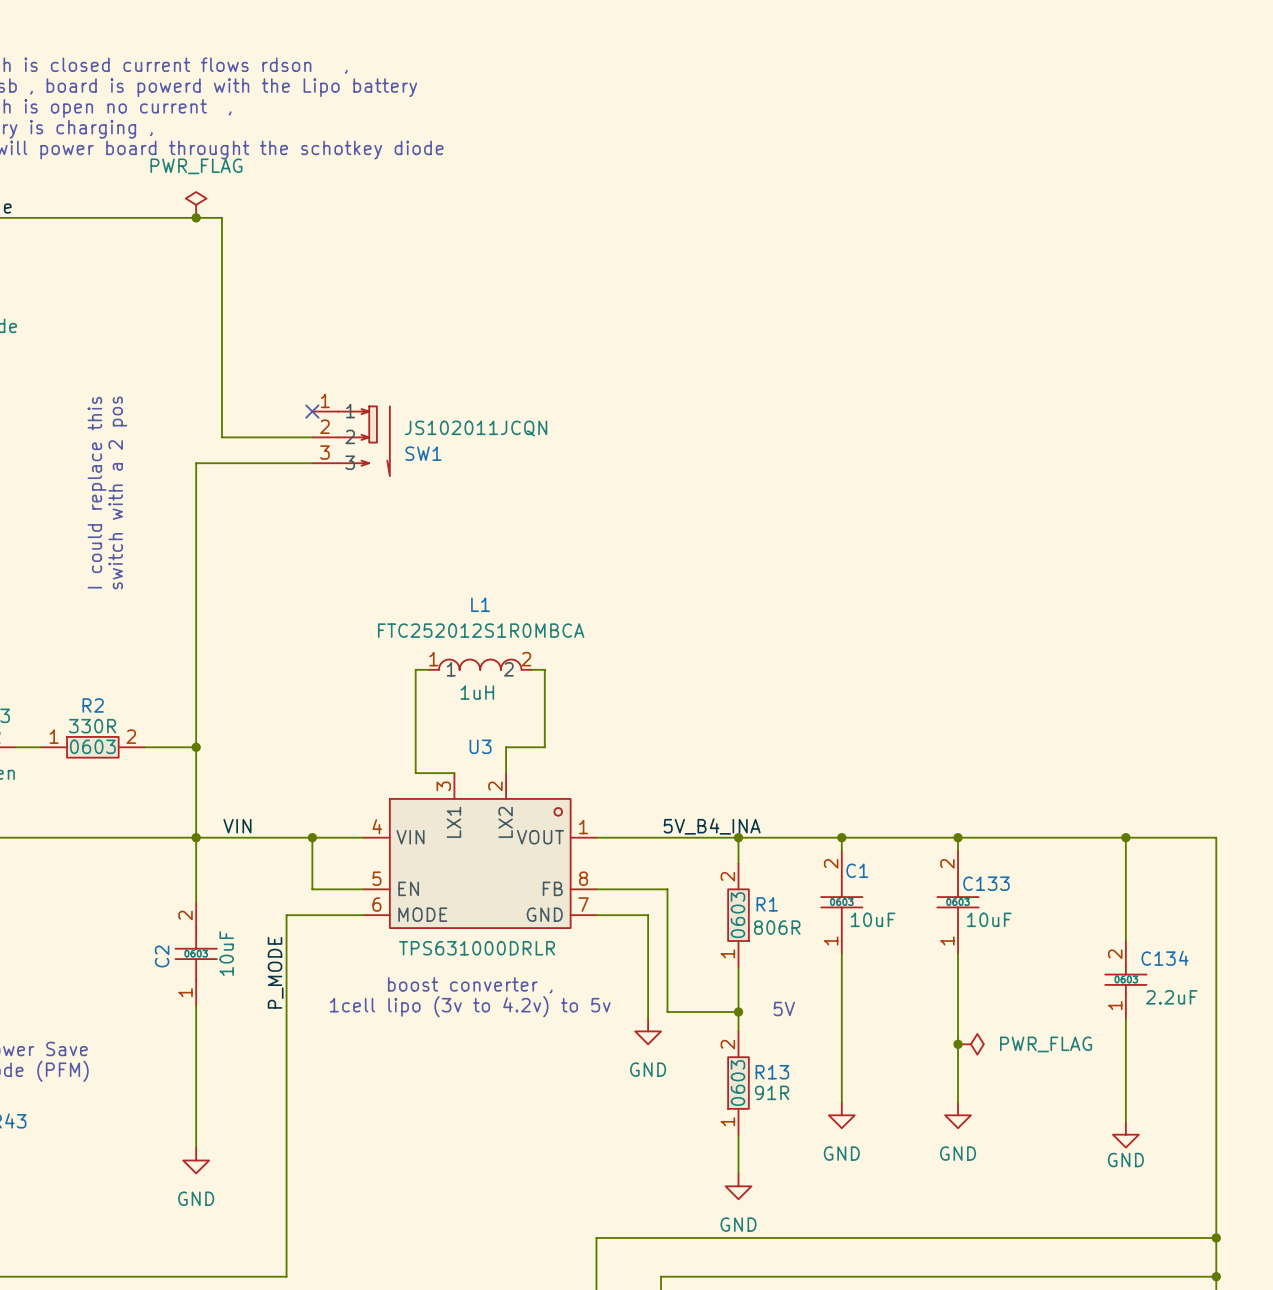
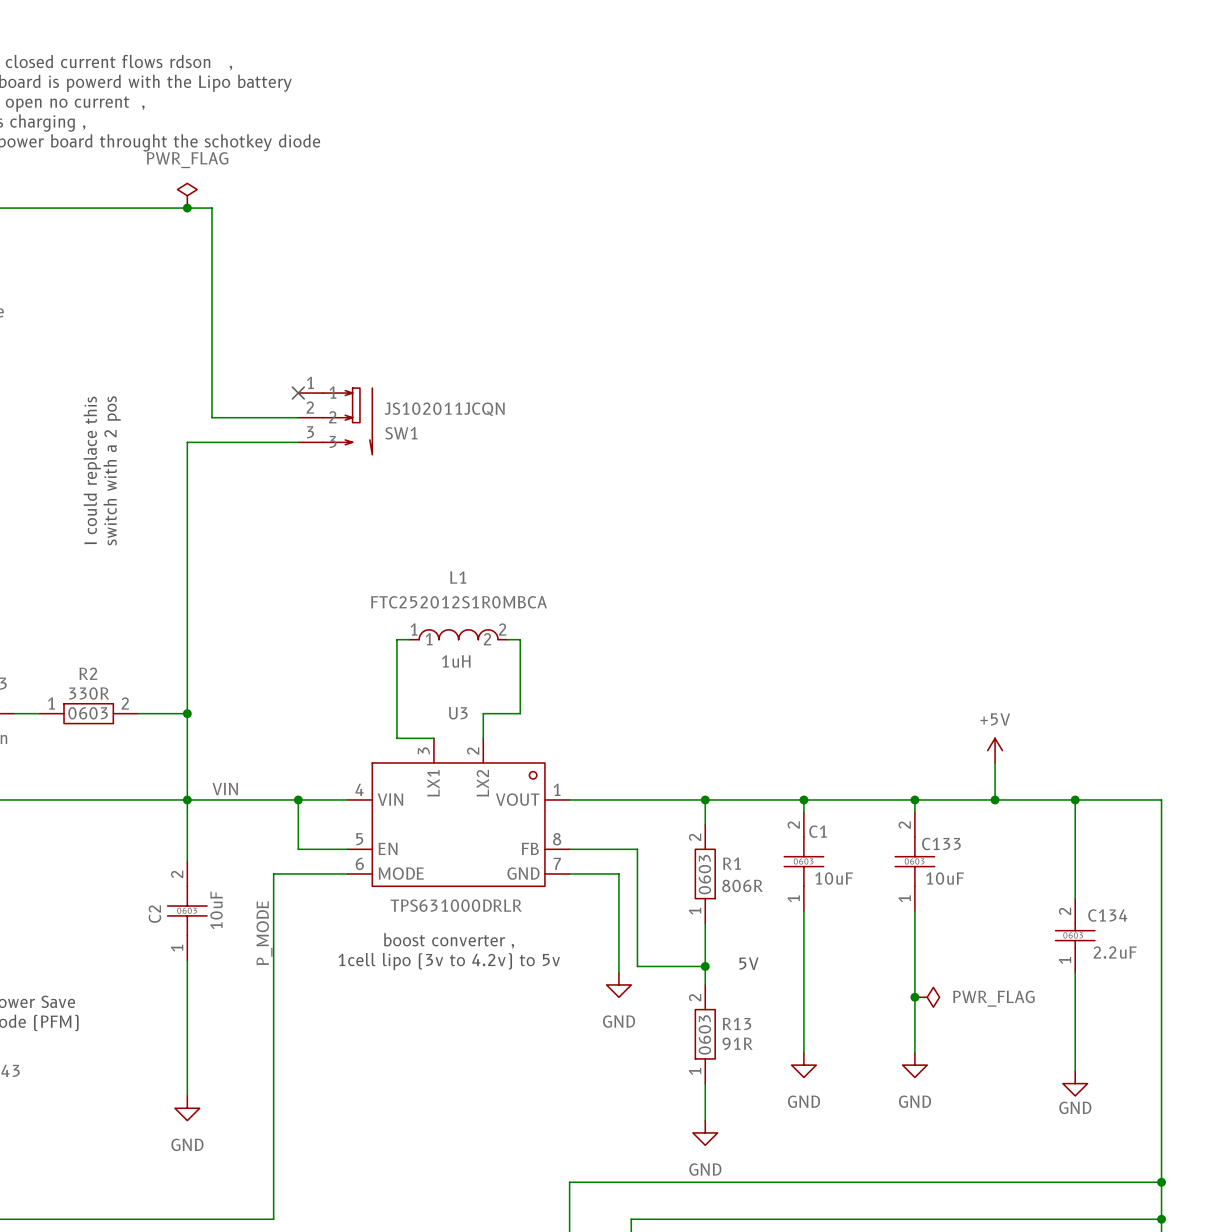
power symbol: none -> +5V (995, 750)
wire: none -> (995, 762) (995, 799)
label: 5V_B4_INA (712, 826) -> none
junction: none -> (995, 799)

